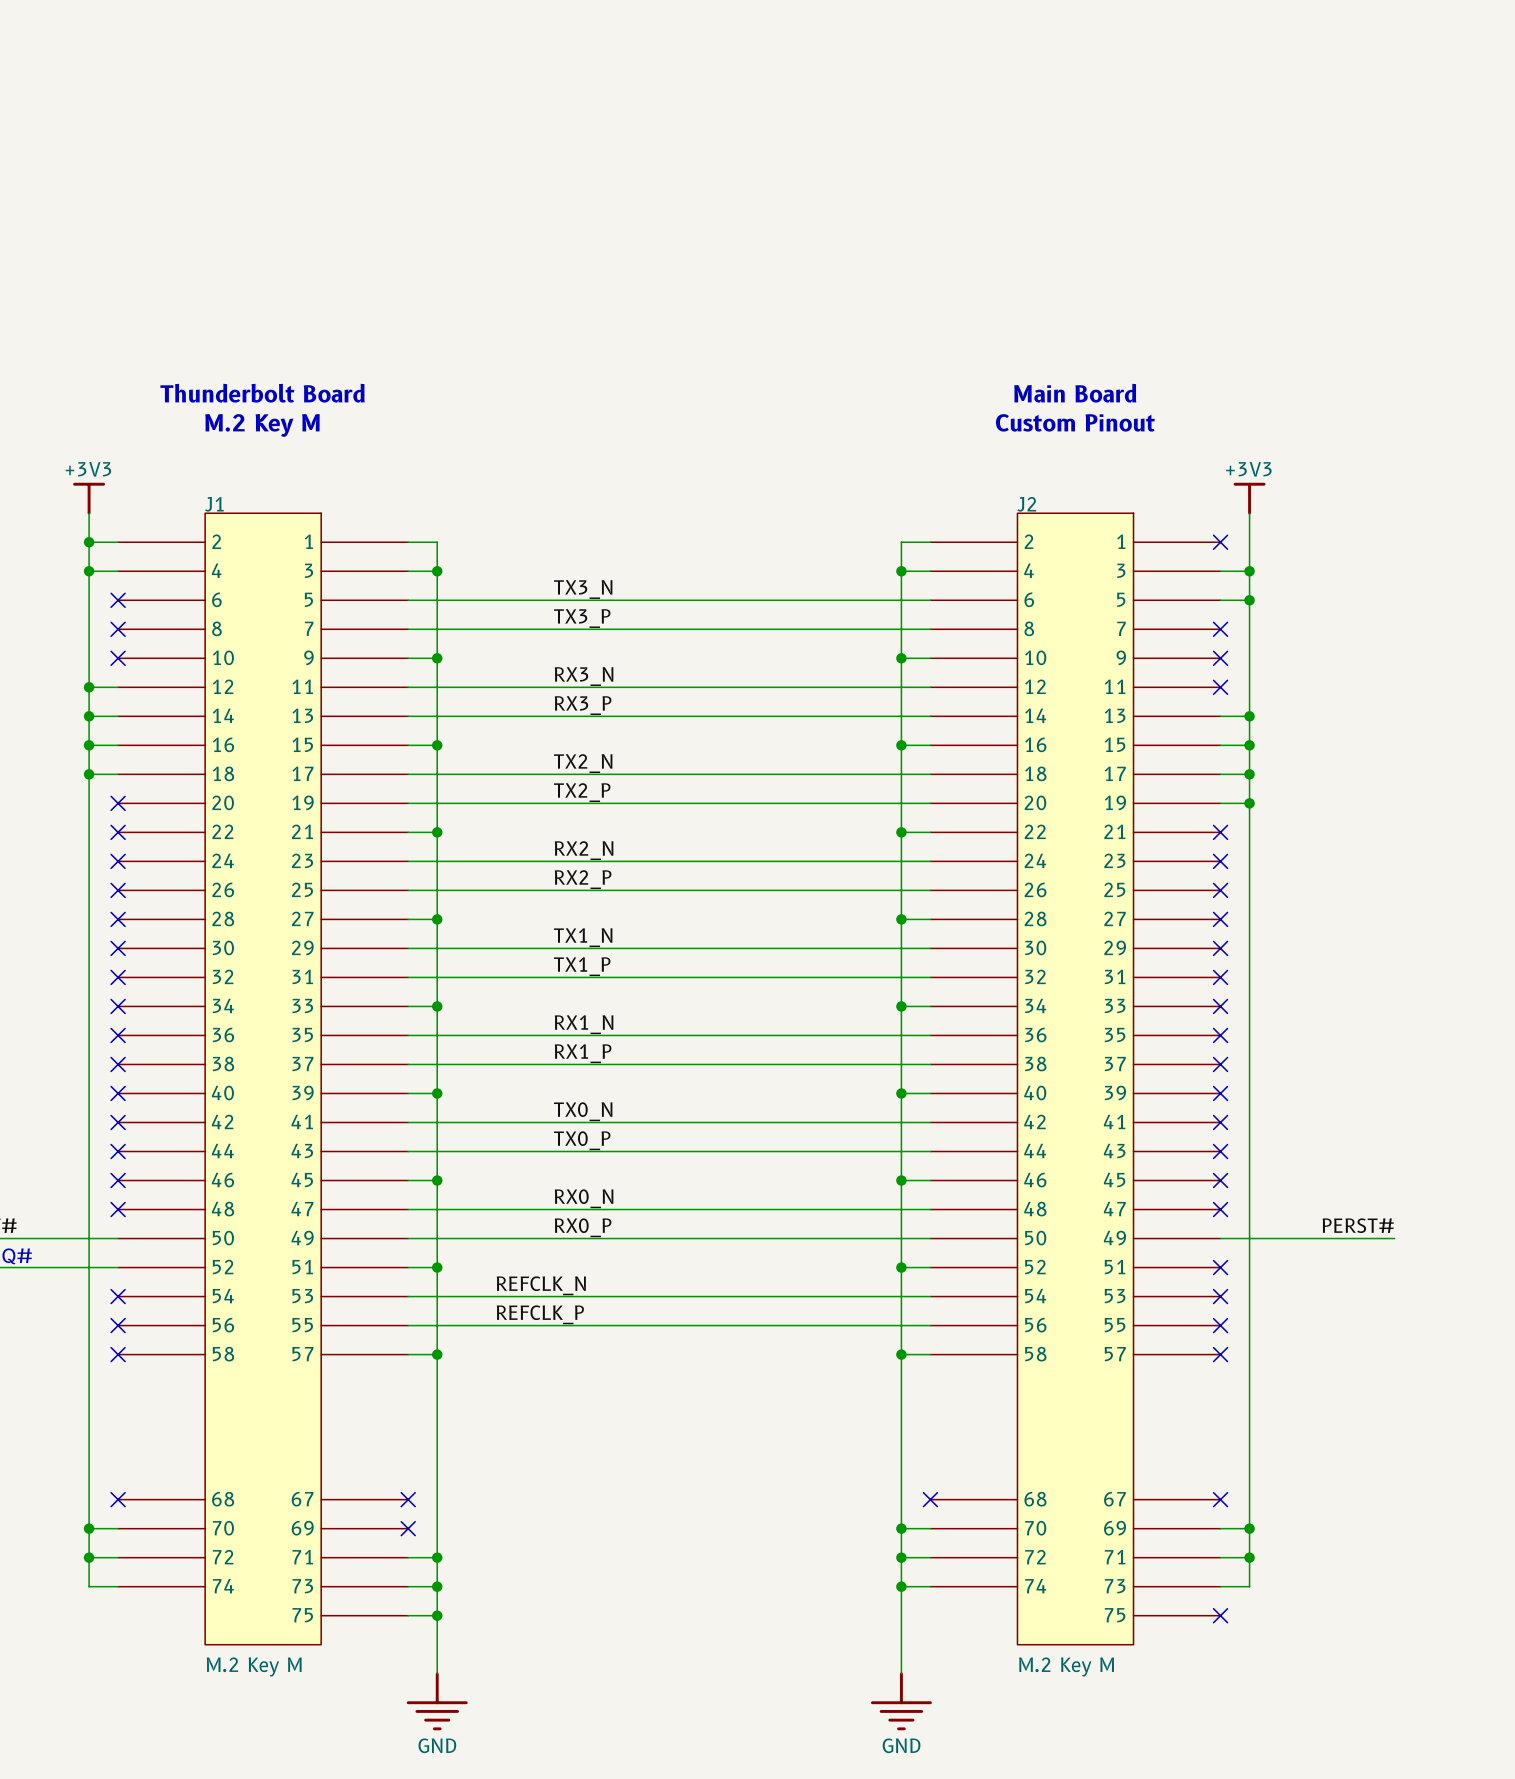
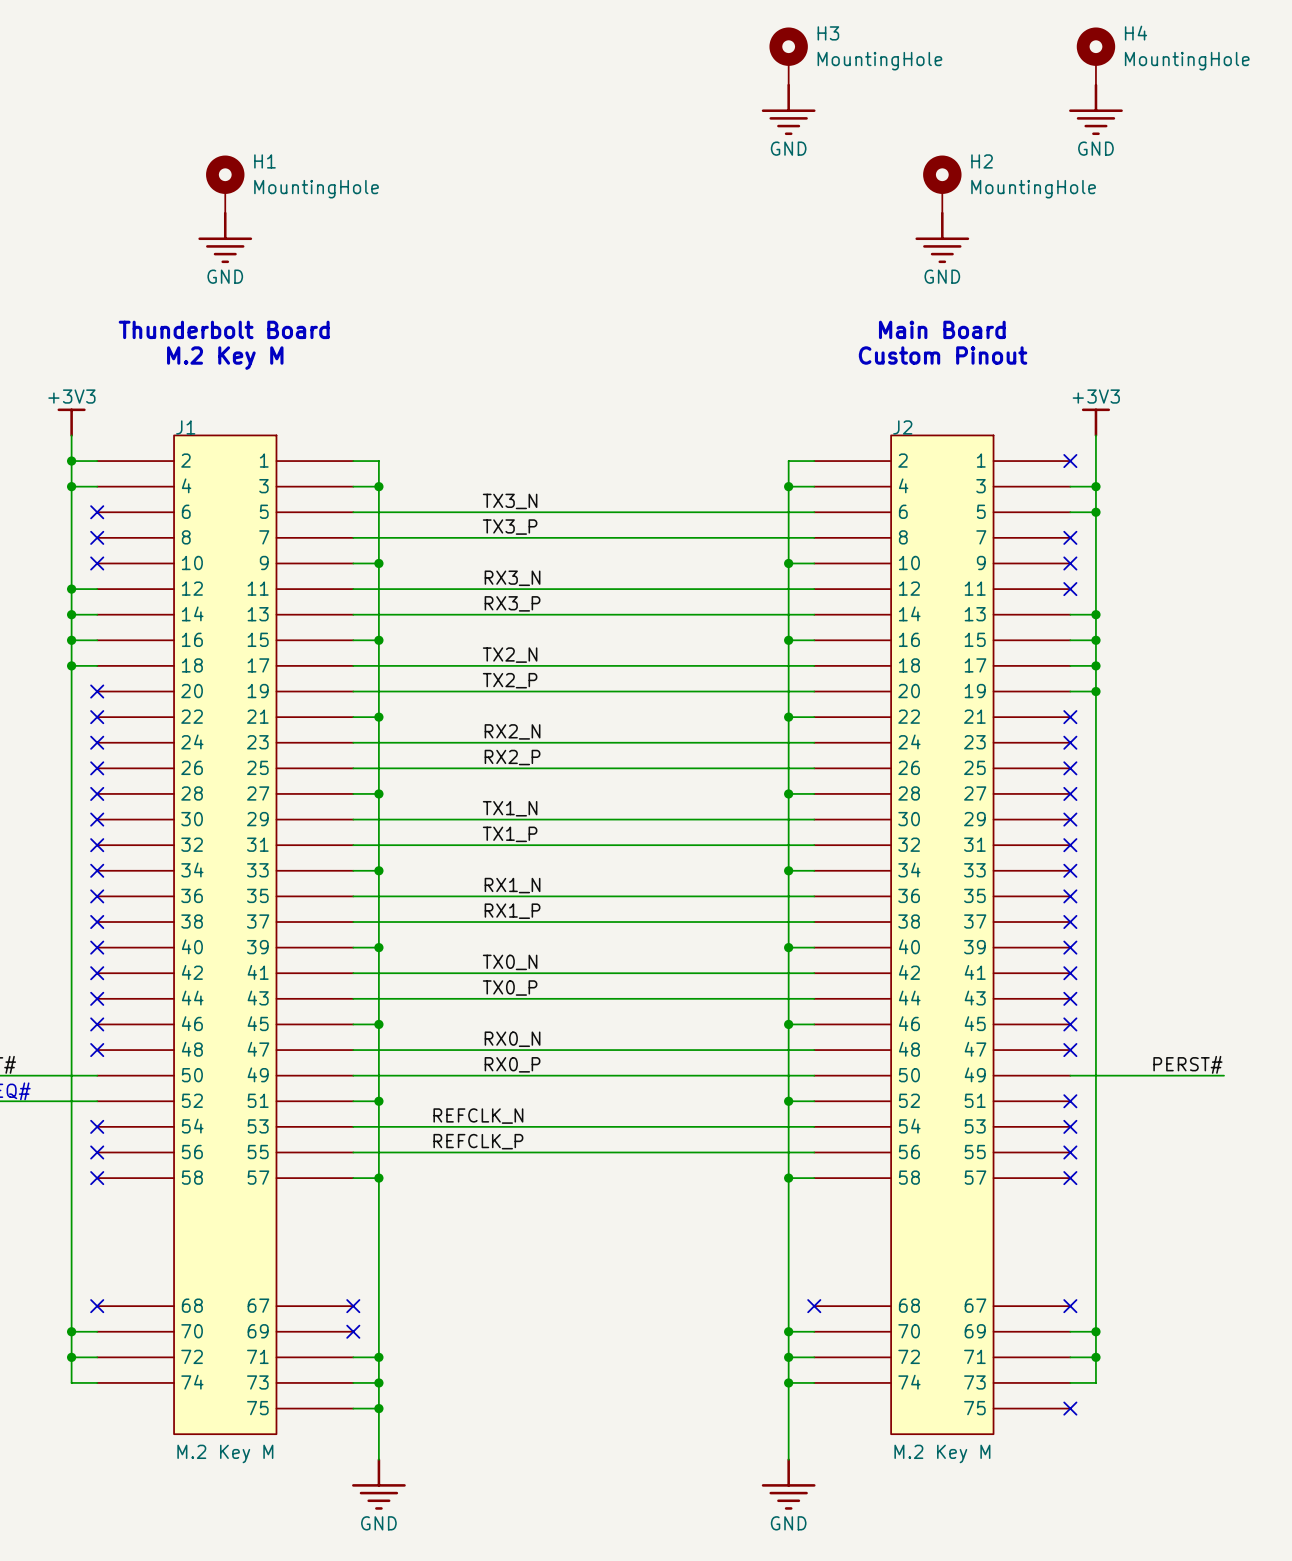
H3: none -> MountingHole (788, 56)
H4: none -> MountingHole (1095, 56)
power symbol: none -> GND (788, 109)
power symbol: none -> GND (1095, 109)
H1: none -> MountingHole (225, 184)
H2: none -> MountingHole (942, 184)
power symbol: none -> GND (225, 237)
power symbol: none -> GND (942, 237)

